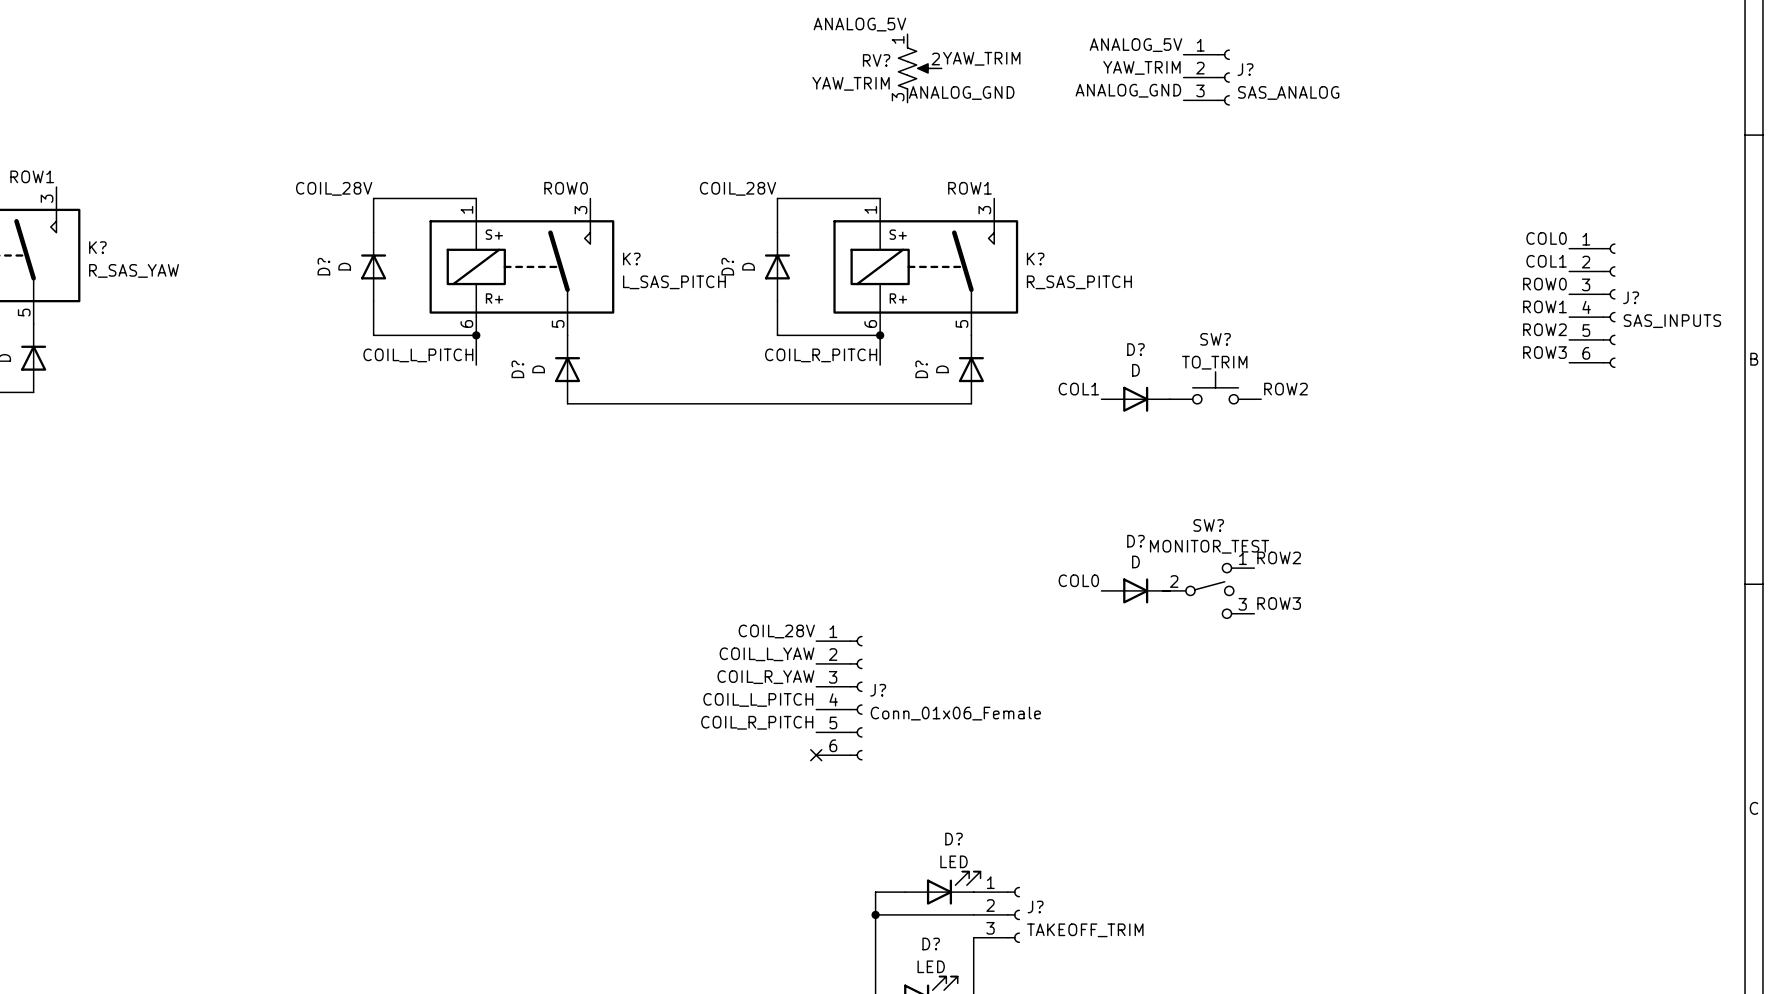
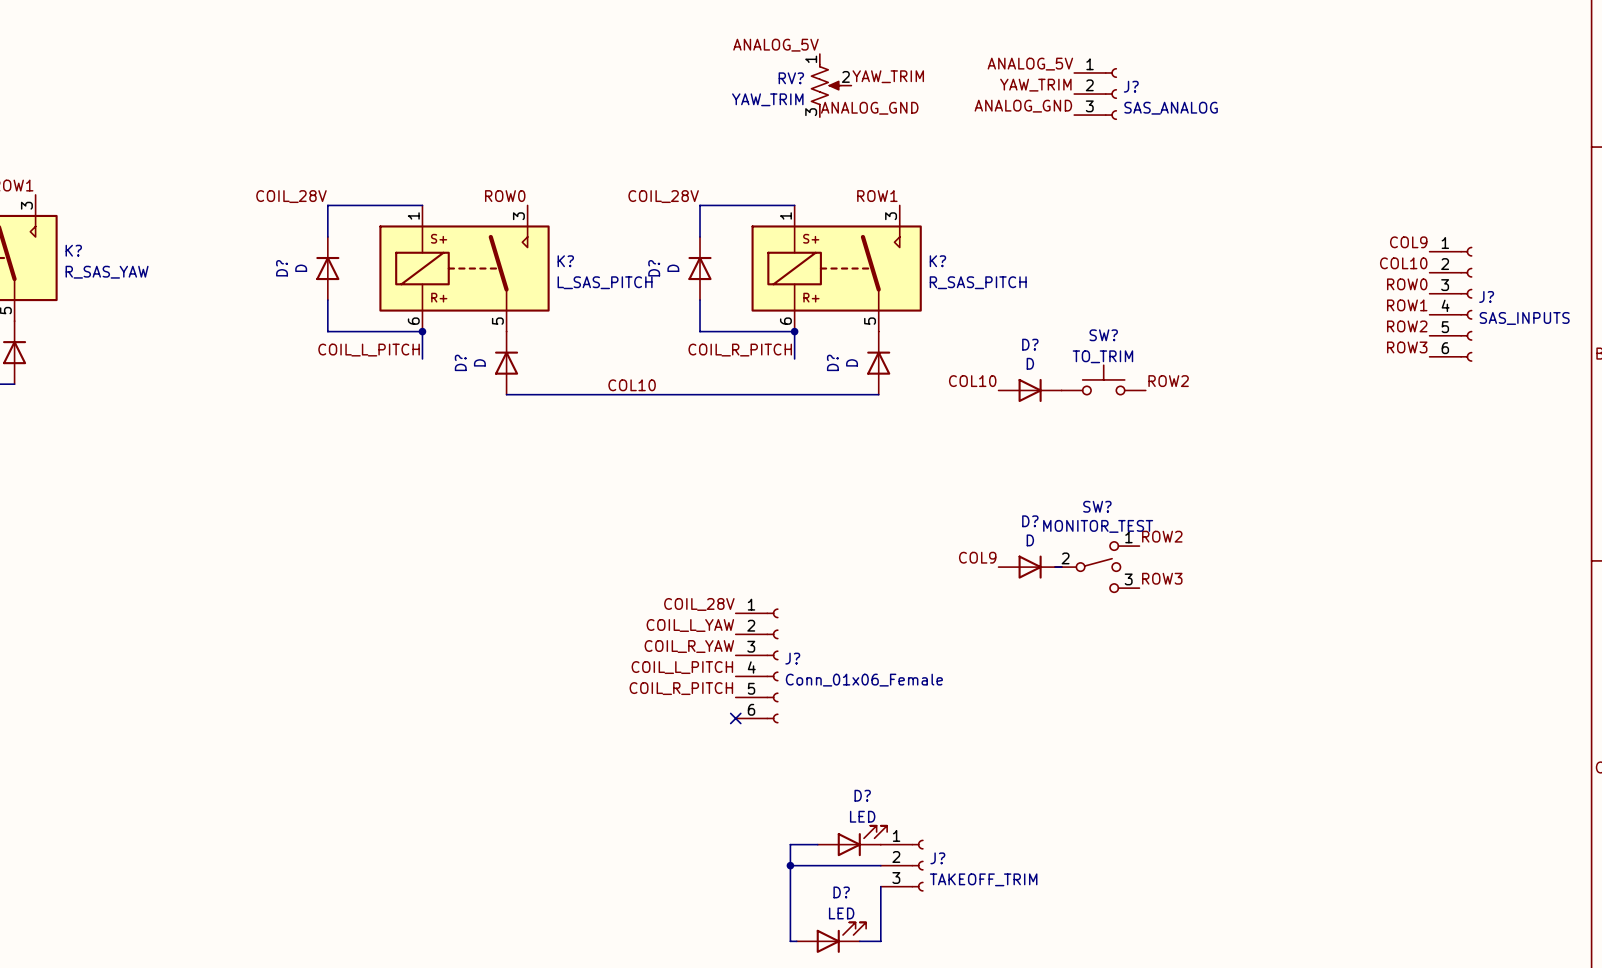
label: COL0 (1546, 238) -> COL9 (1408, 242)
label: COL1 (1546, 261) -> COL10 (1403, 263)
label: COL1 (1078, 389) -> COL10 (972, 381)
label: none -> COL10 (632, 385)
label: COL0 (1078, 580) -> COL9 (977, 557)

